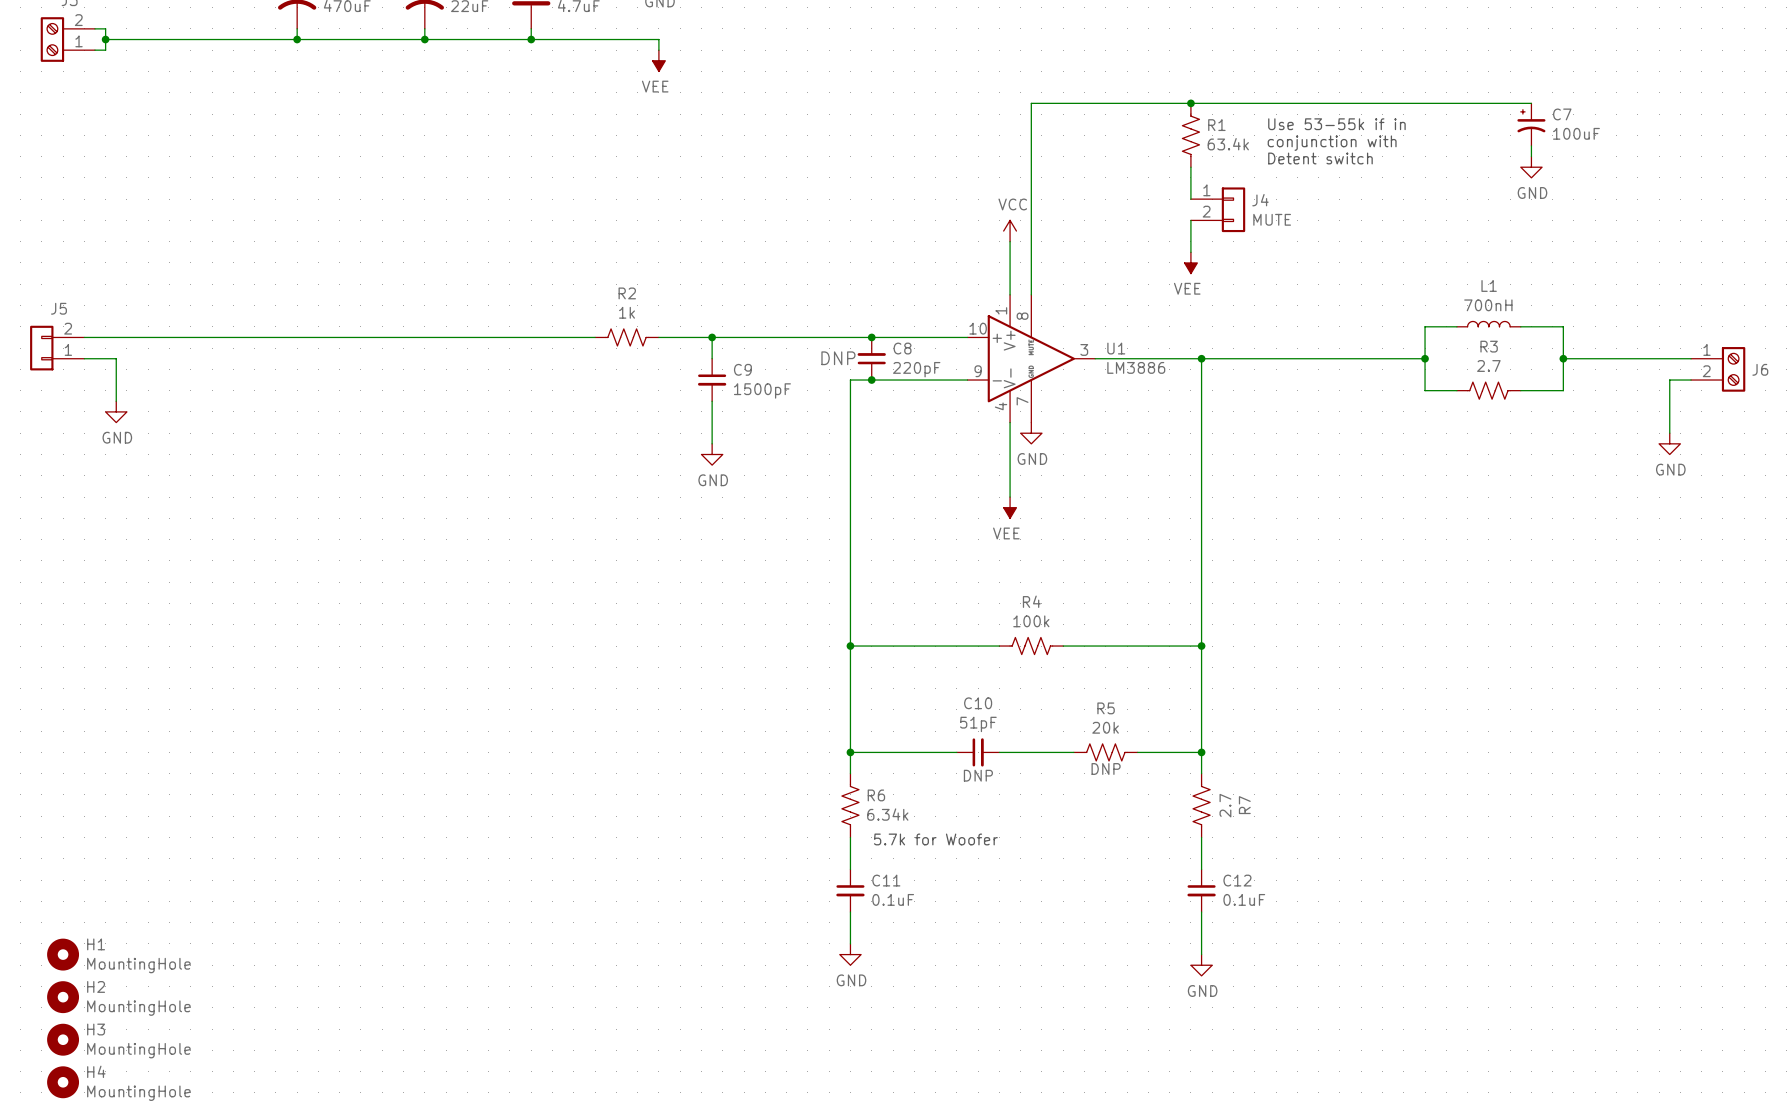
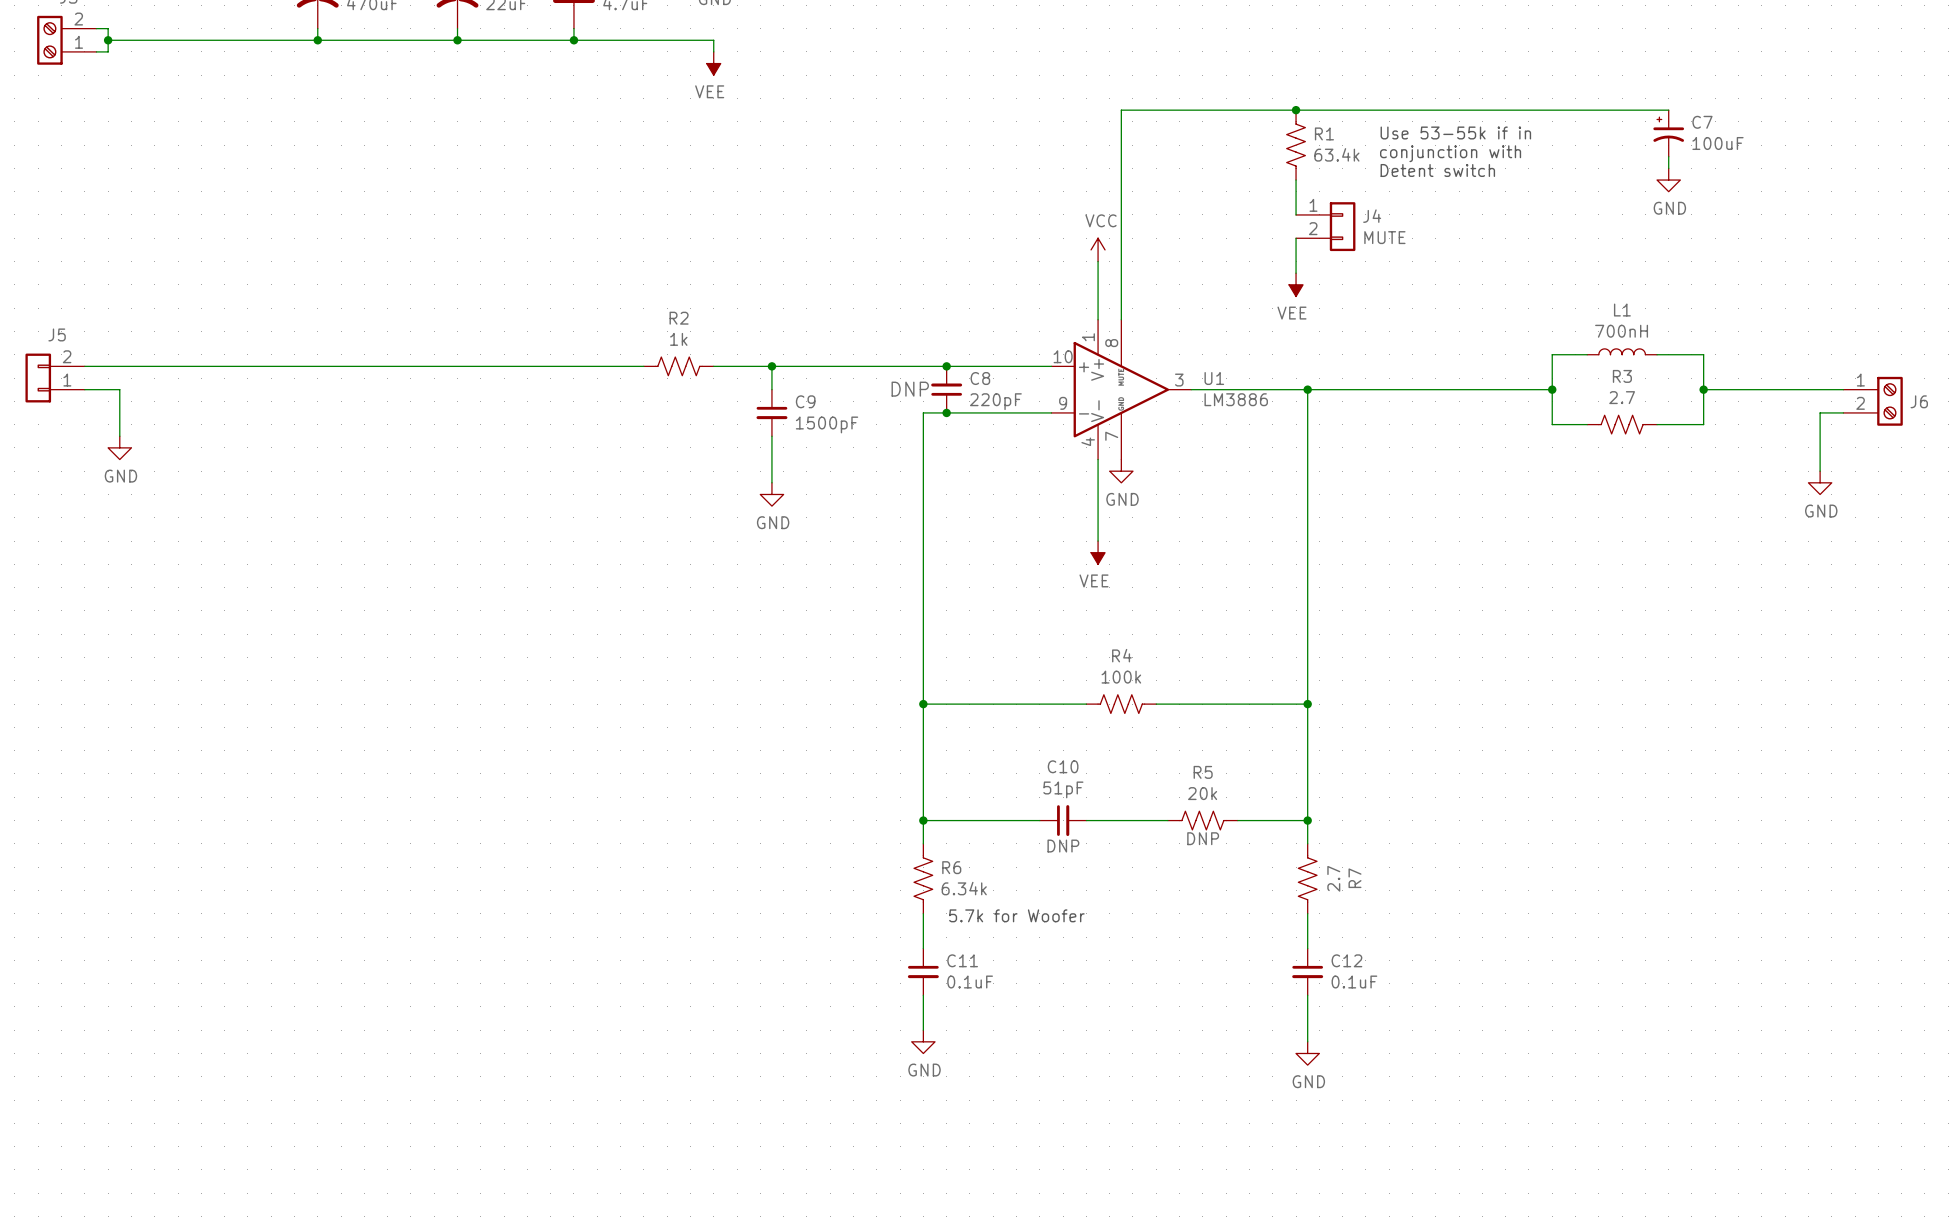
H1: MountingHole (63, 954) -> none
H2: MountingHole (63, 997) -> none
H3: MountingHole (63, 1039) -> none
H4: MountingHole (63, 1082) -> none

